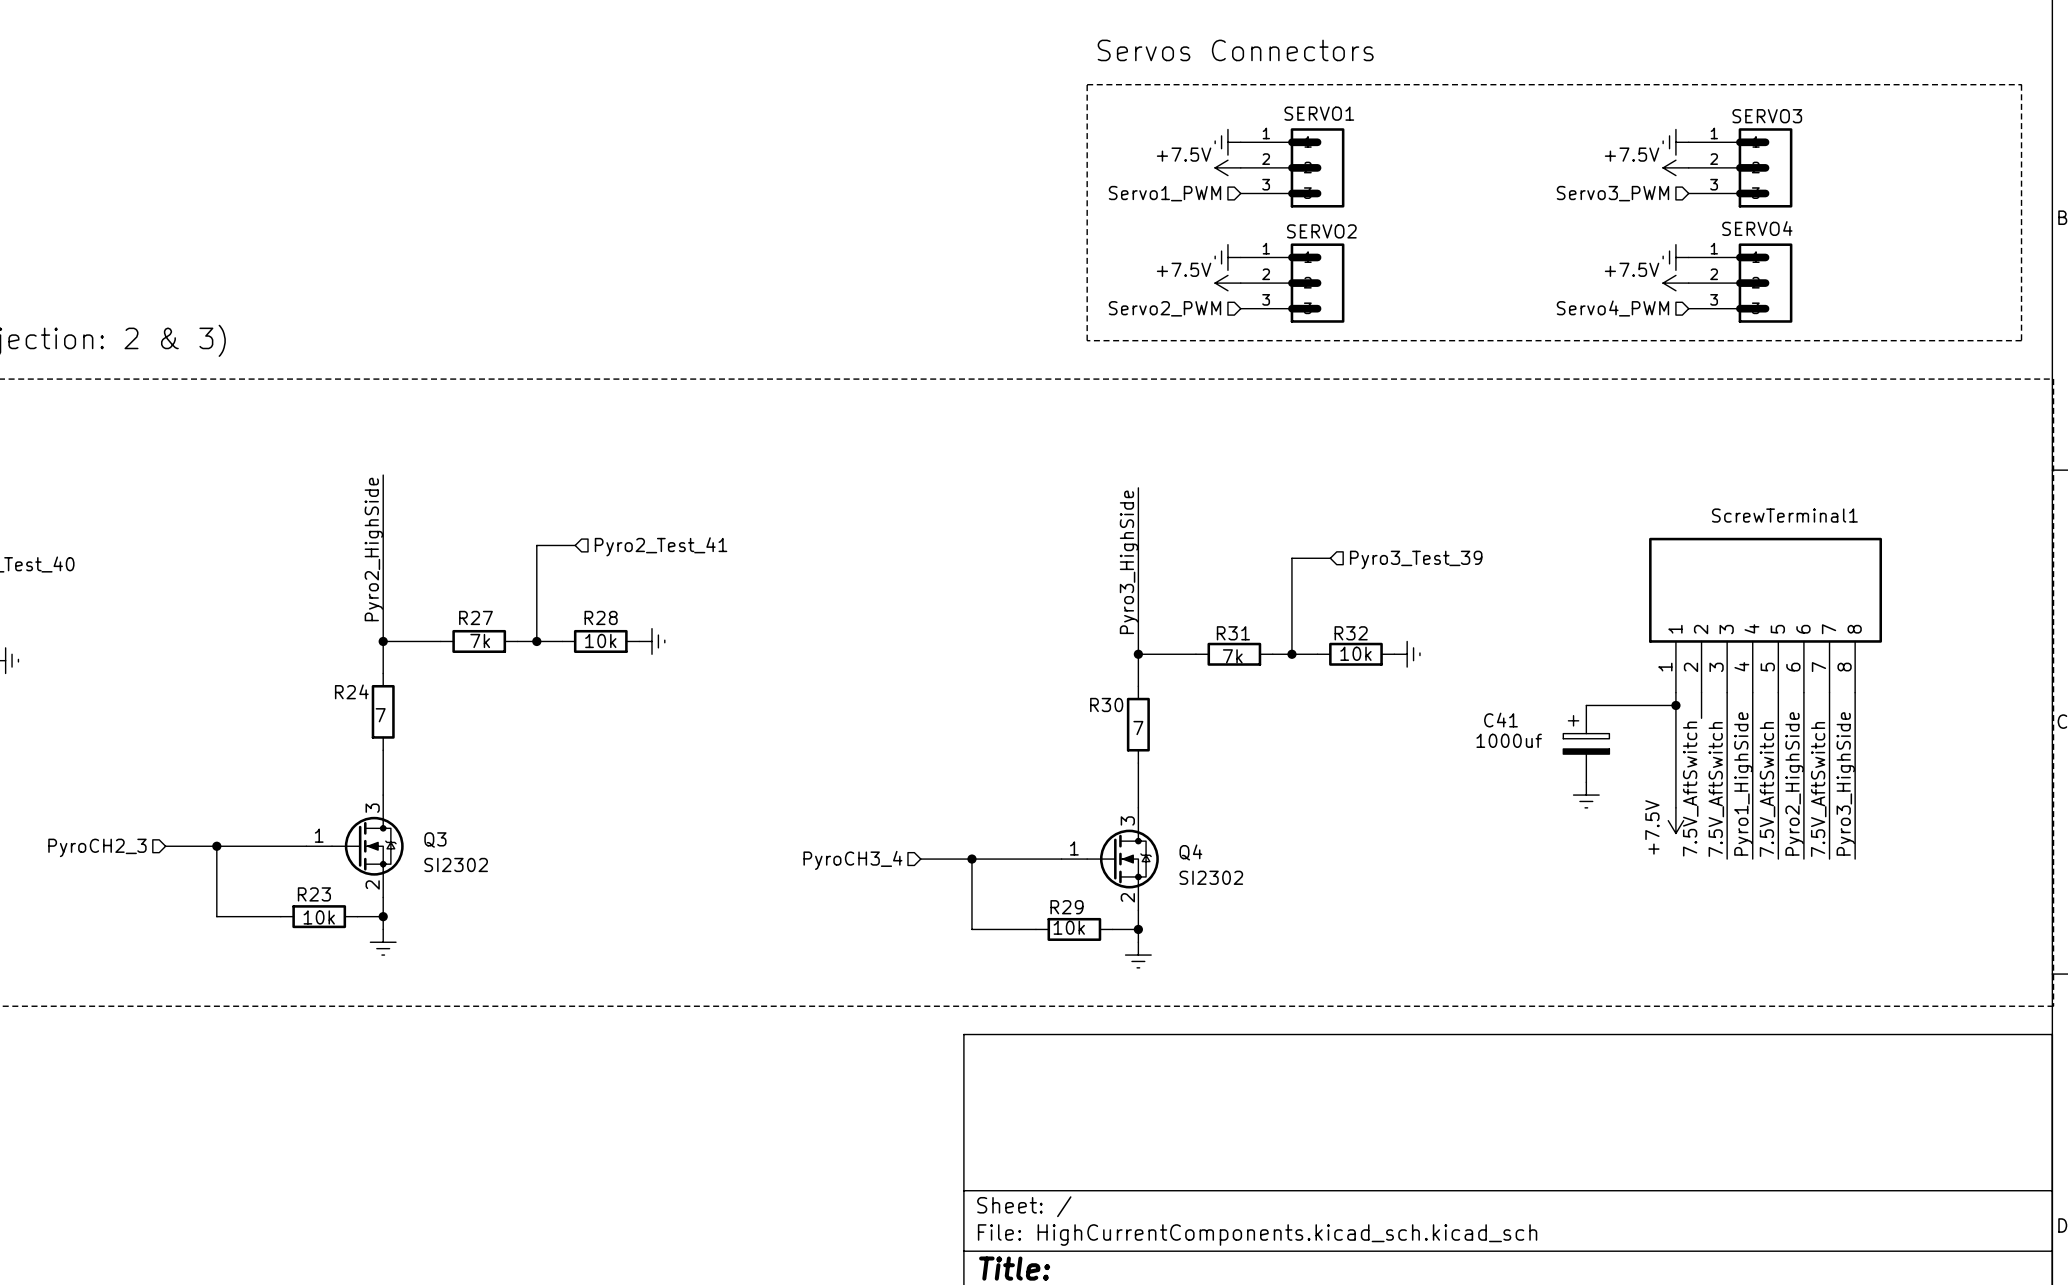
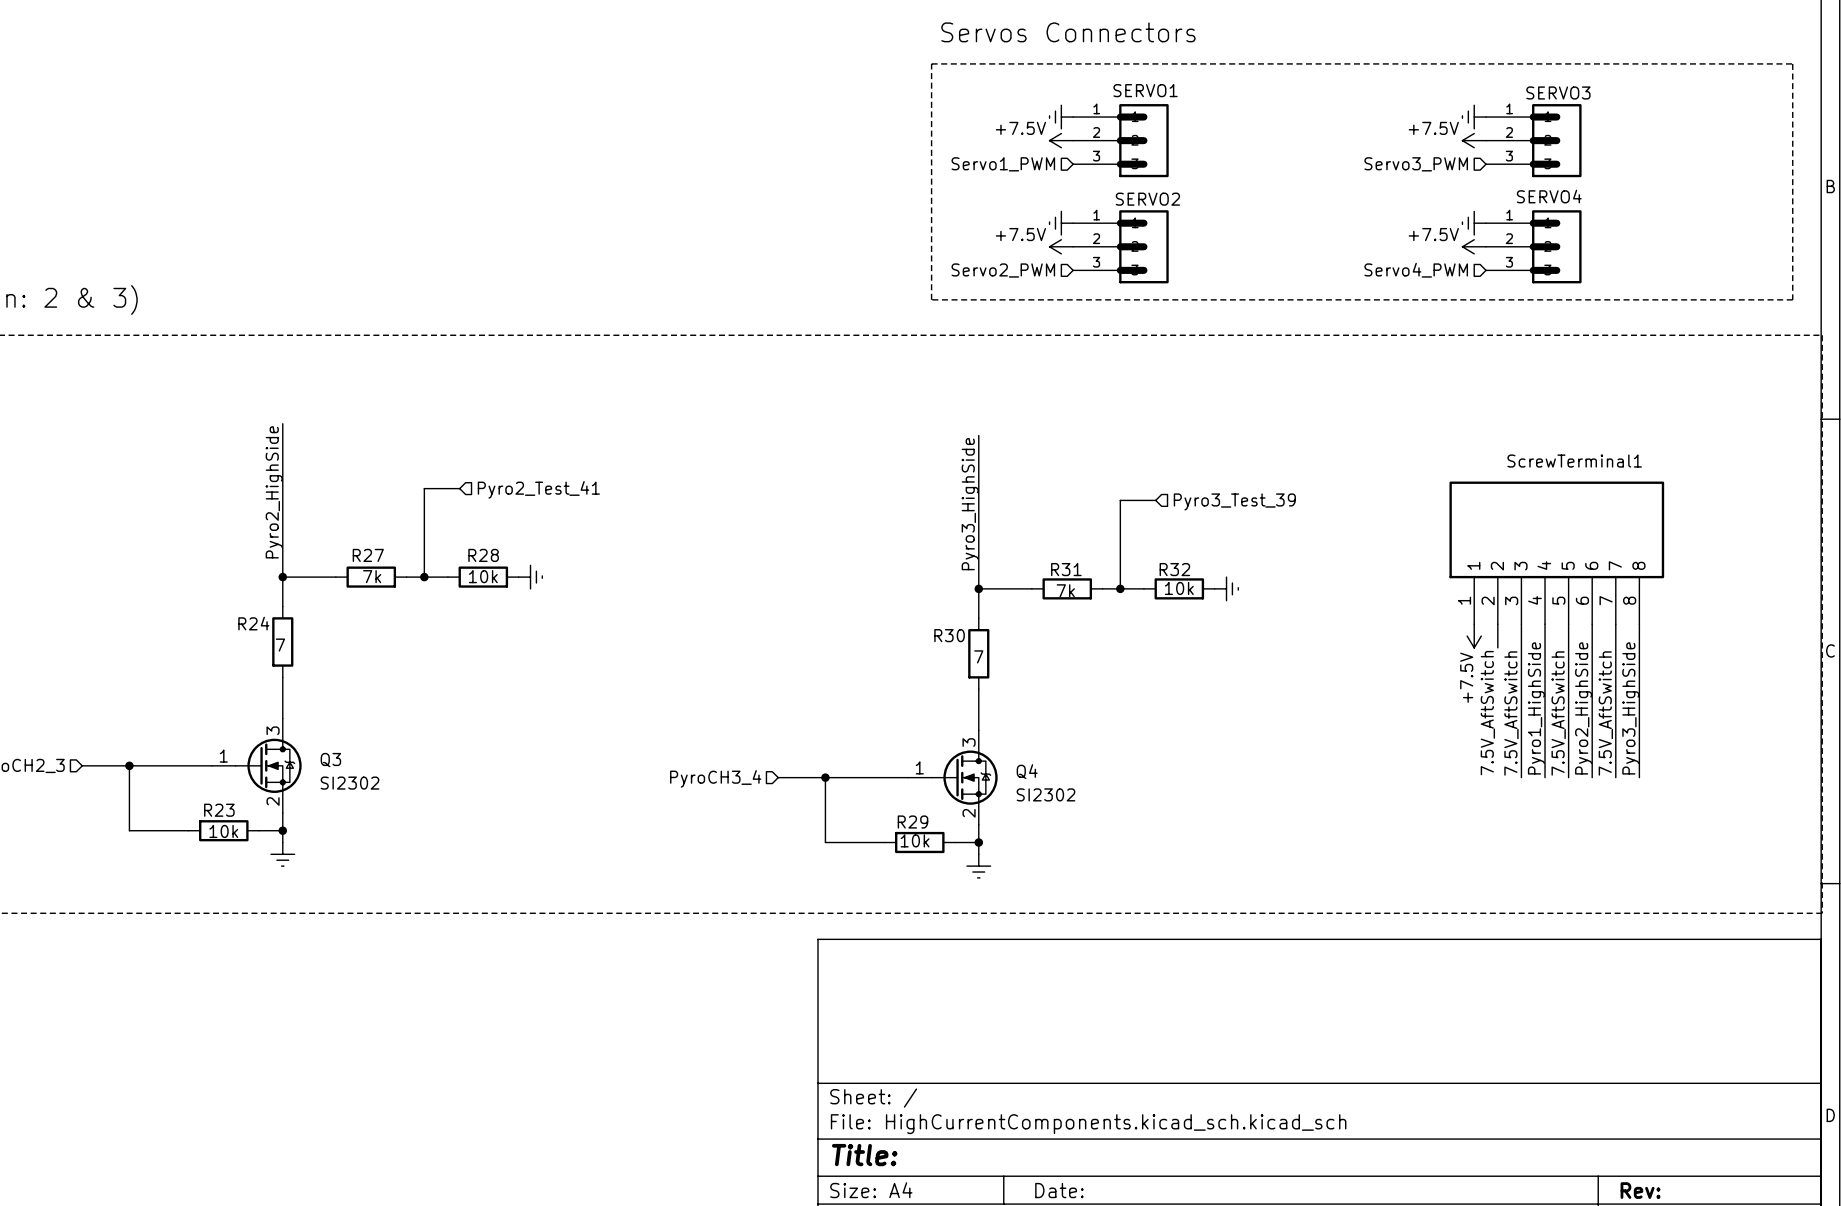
wire: (1675, 692) (1675, 807) -> none
wire: (1586, 705) (1675, 705) -> none
junction: (1675, 705) -> none
C41: 1000uf (1586, 743) -> none
power symbol: (1586, 795) -> none
power symbol position: +7.5V (1675, 820) -> +7.5V (1474, 636)
power symbol text position: +7.5V (1652, 827) -> +7.5V (1466, 677)

